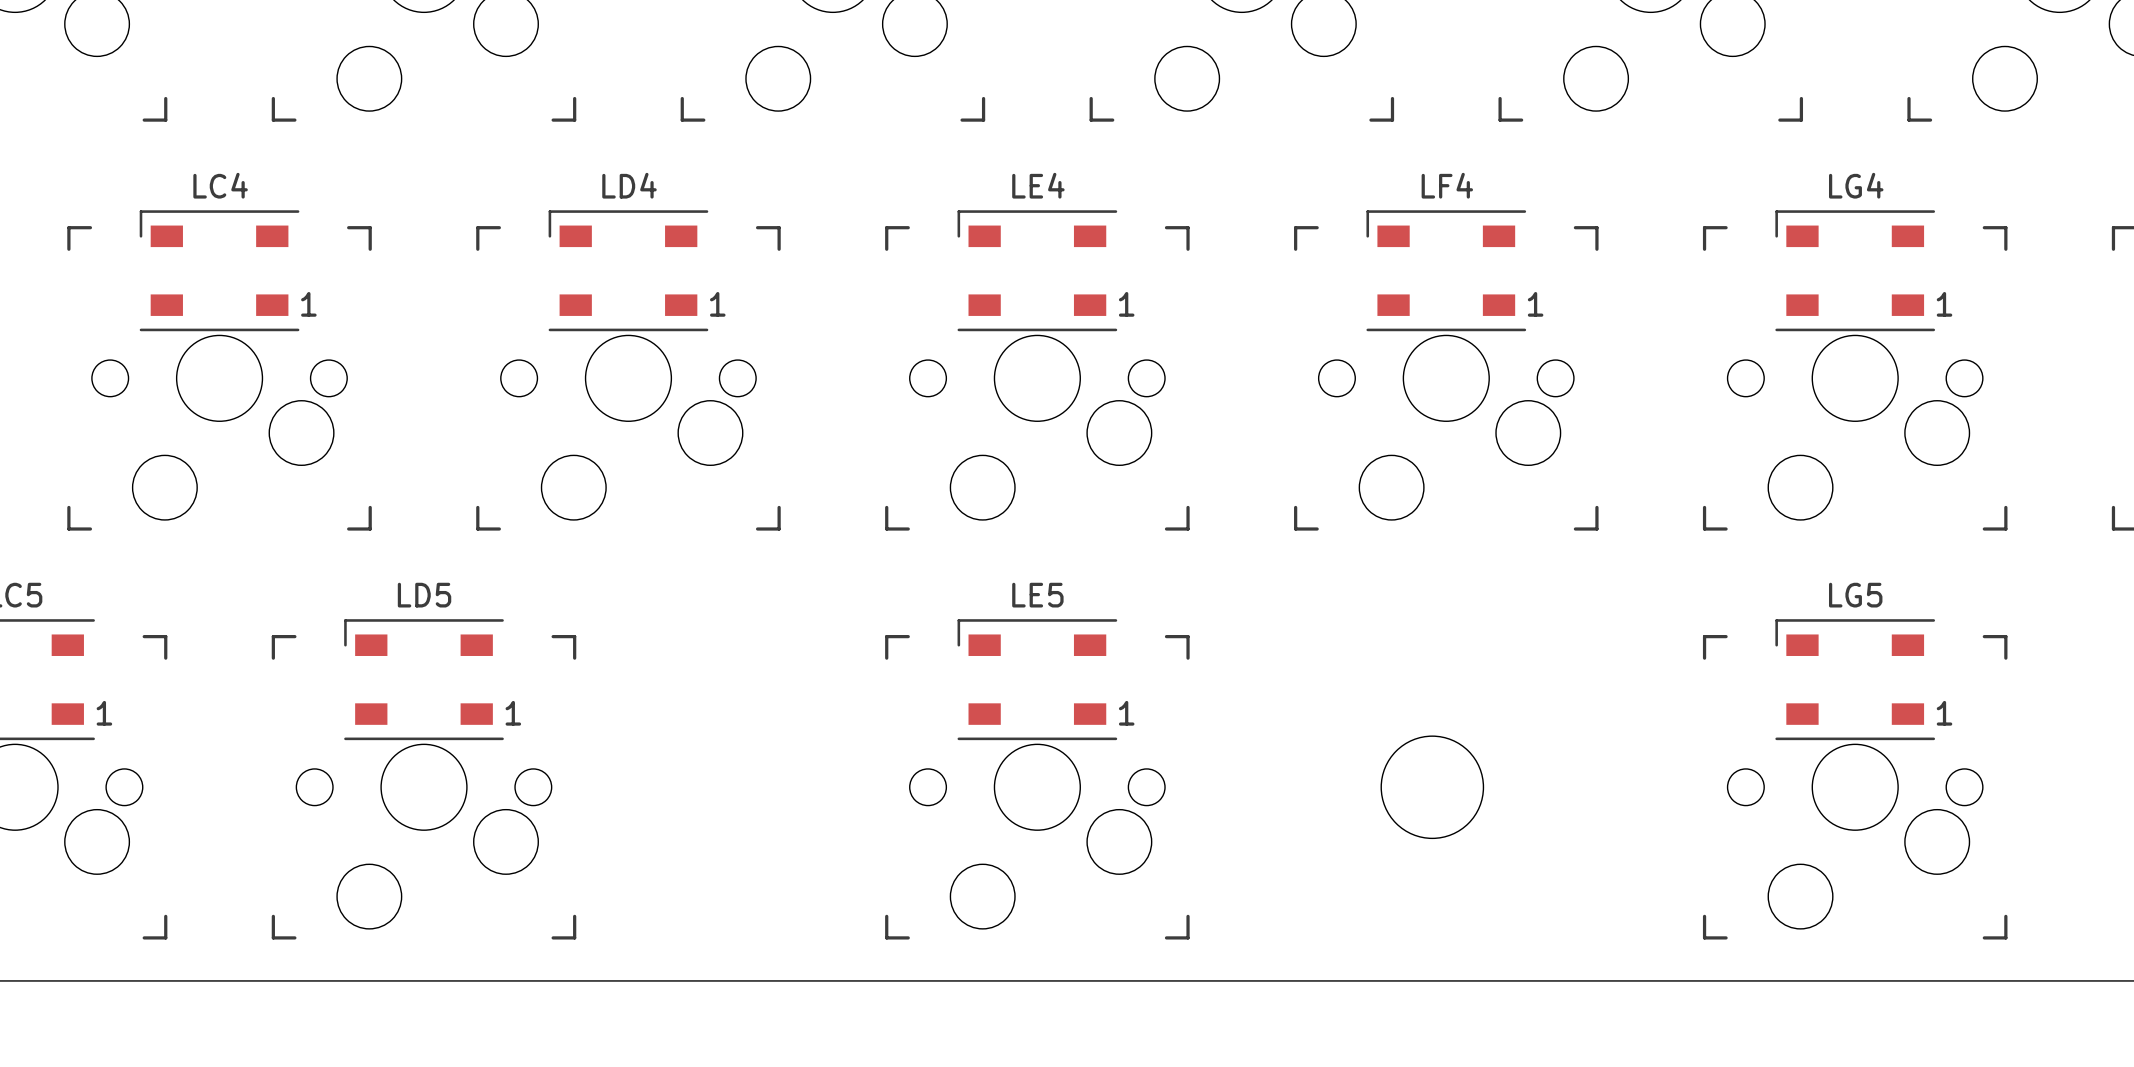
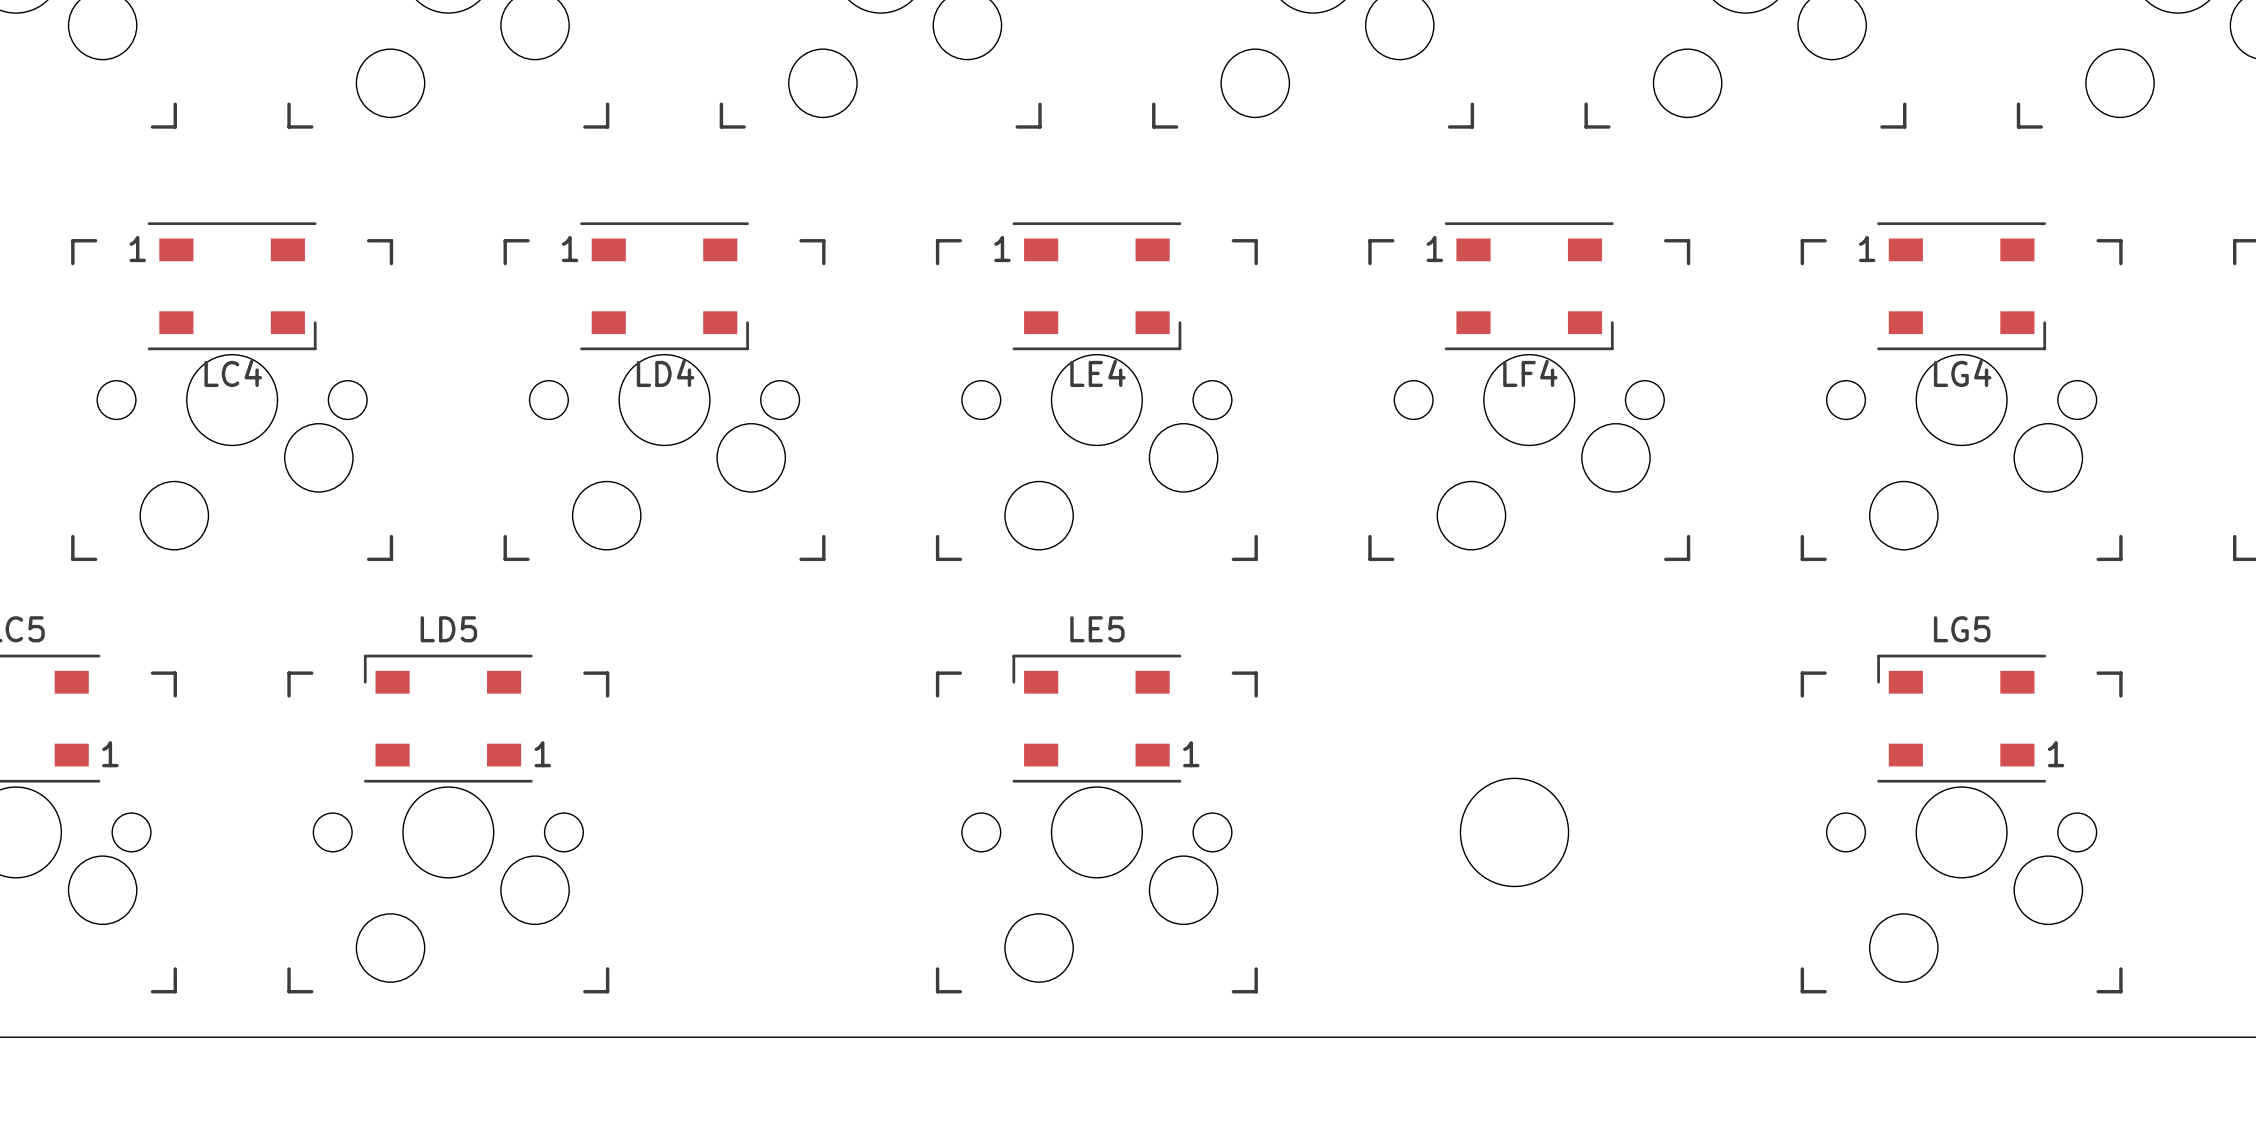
LC4 rotation: 0° (219, 270) -> 180° (232, 286)
LD4 rotation: 0° (628, 270) -> 180° (664, 286)
LE4 rotation: 0° (1037, 270) -> 180° (1096, 286)
LF4 rotation: 0° (1446, 270) -> 180° (1529, 286)
LG4 rotation: 0° (1855, 270) -> 180° (1961, 286)

